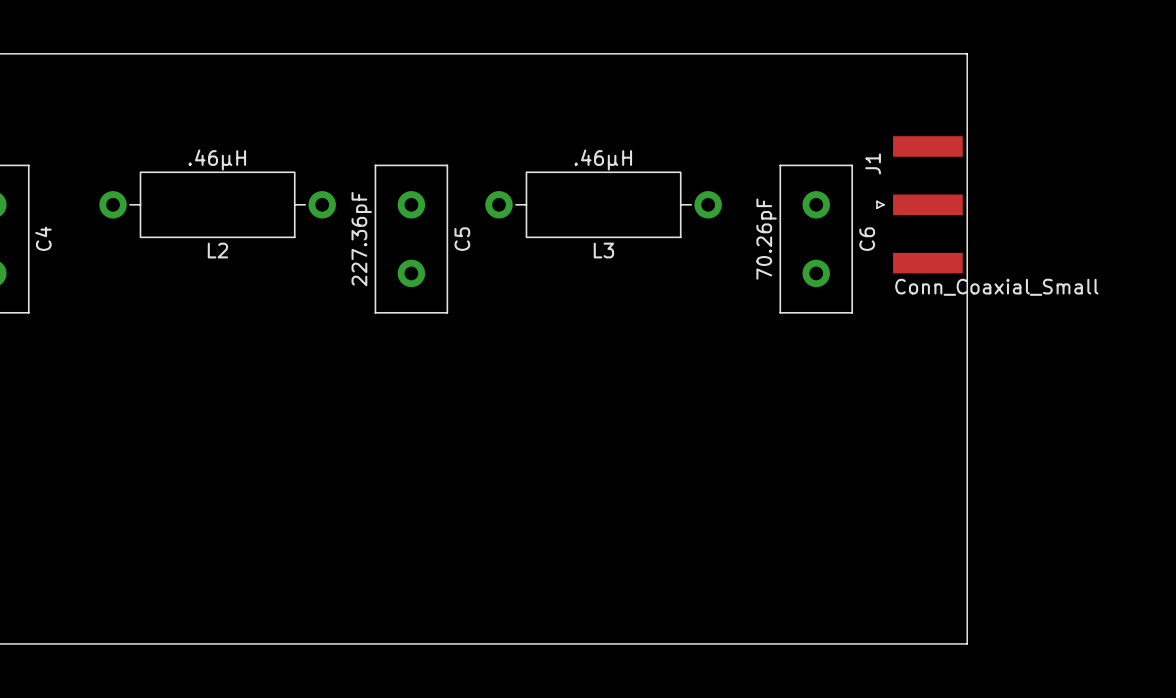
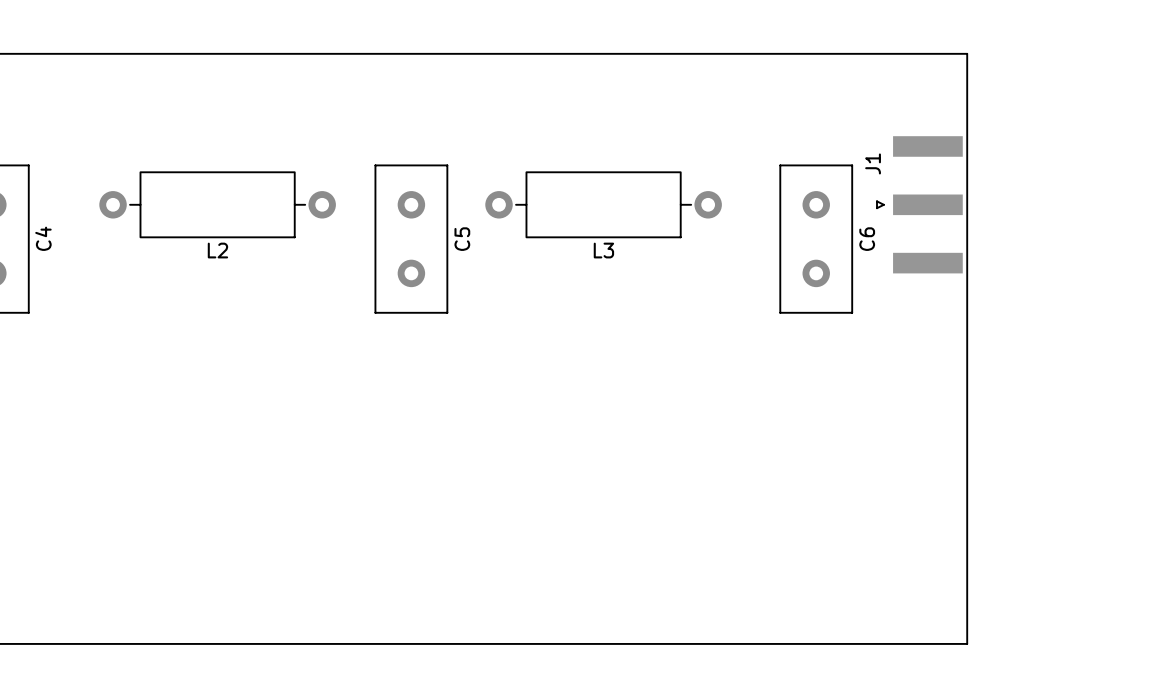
L2 value: .46µH (217, 160) -> none
L3 value: .46µH (603, 160) -> none
C5 value: 227.36pF (361, 239) -> none
C6 value: 70.26pF (766, 239) -> none
J1 value: Conn_Coaxial_Small (996, 287) -> none

